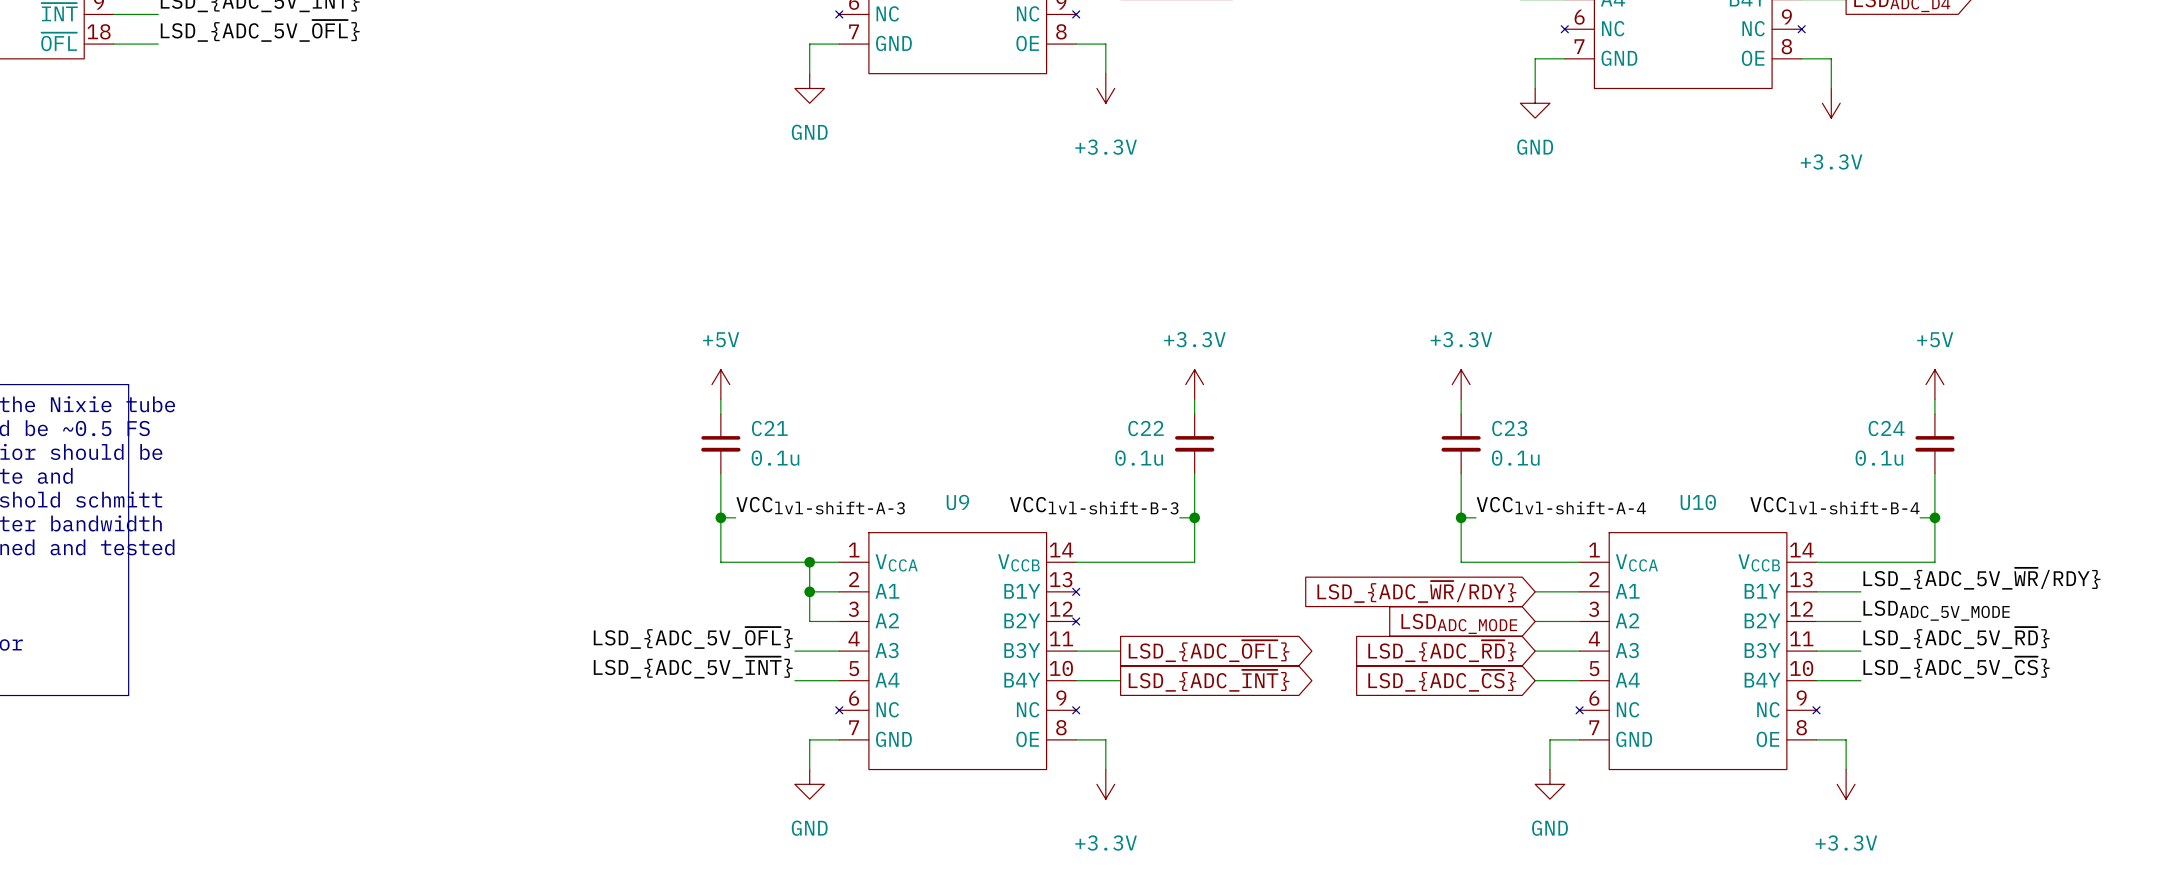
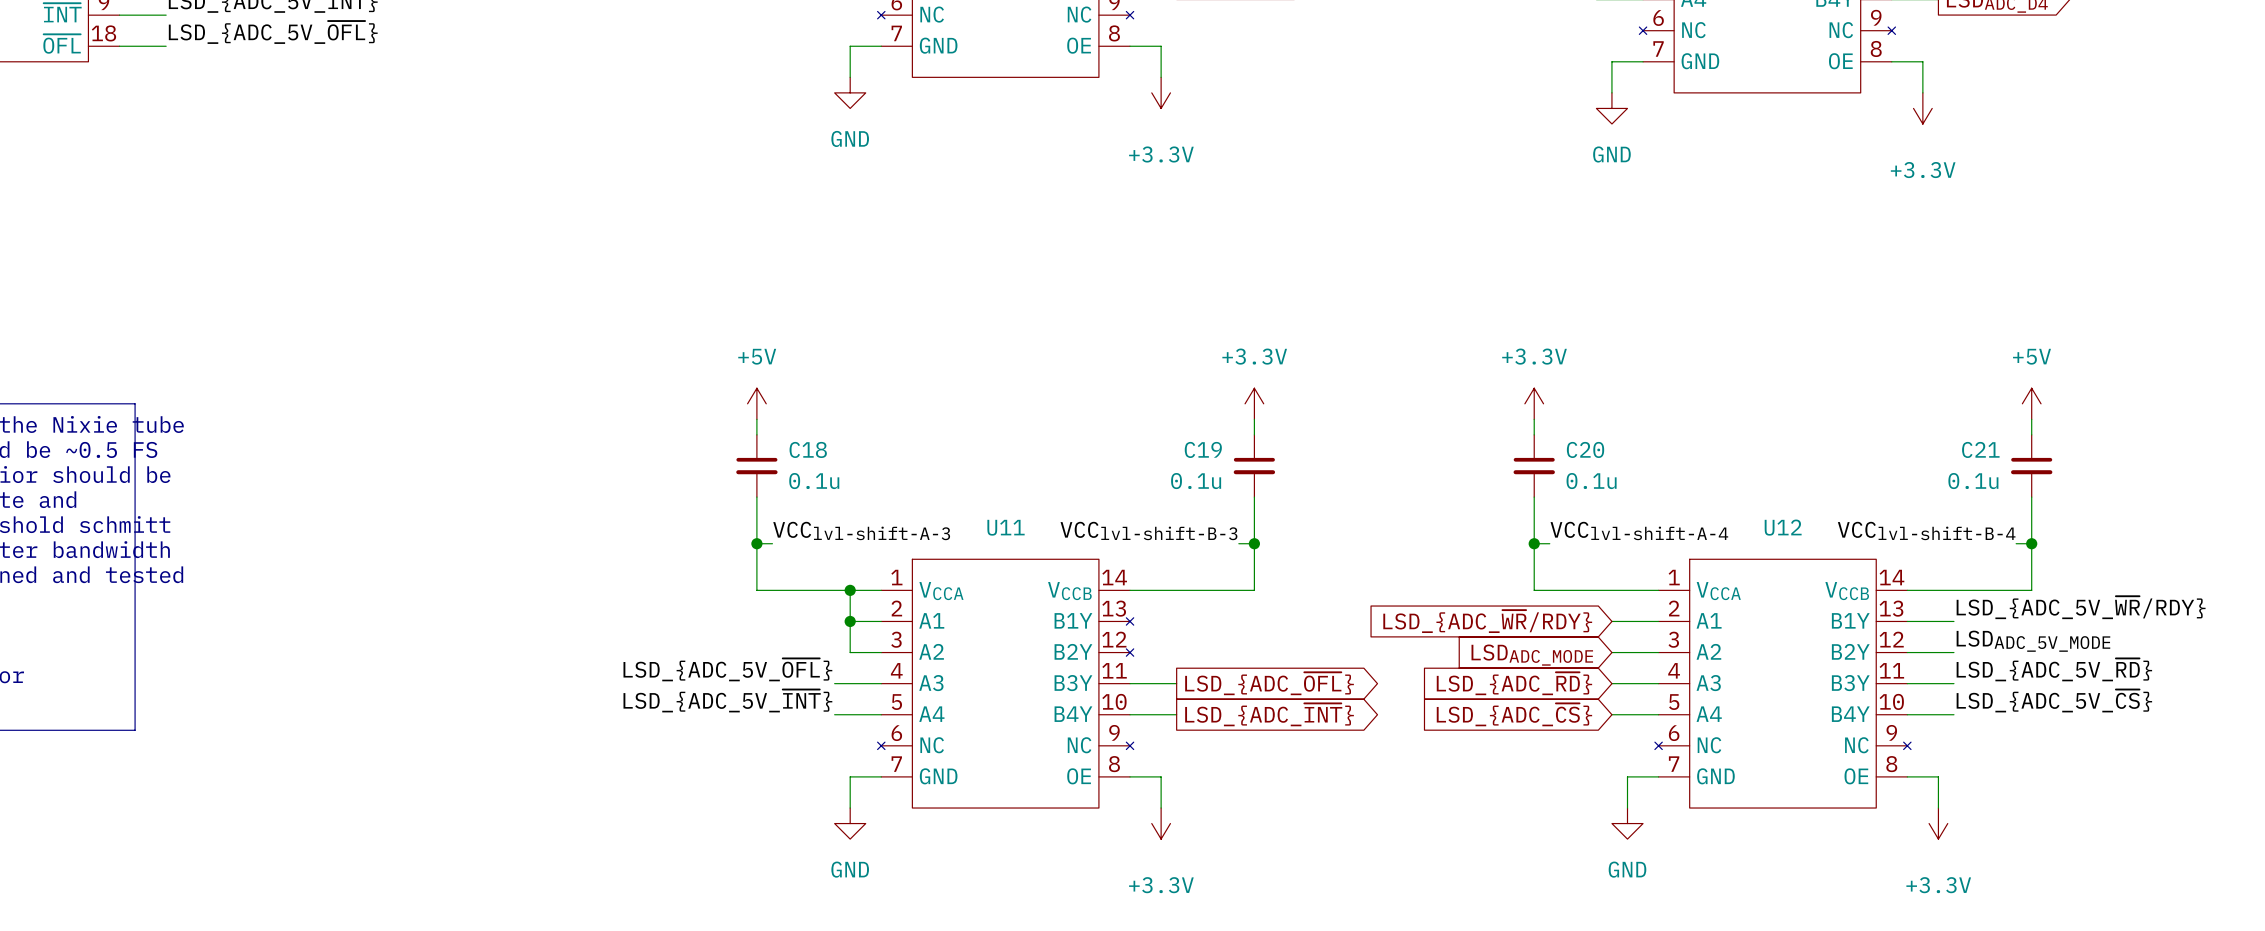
C21 name: C21 (769, 428) -> C18 (808, 449)
C22 name: C22 (1146, 428) -> C19 (1203, 449)
C23 name: C23 (1509, 428) -> C20 (1585, 449)
C24 name: C24 (1886, 428) -> C21 (1980, 449)
U9 name: U9 (957, 502) -> U11 (1006, 527)
U10 name: U10 (1698, 502) -> U12 (1783, 527)

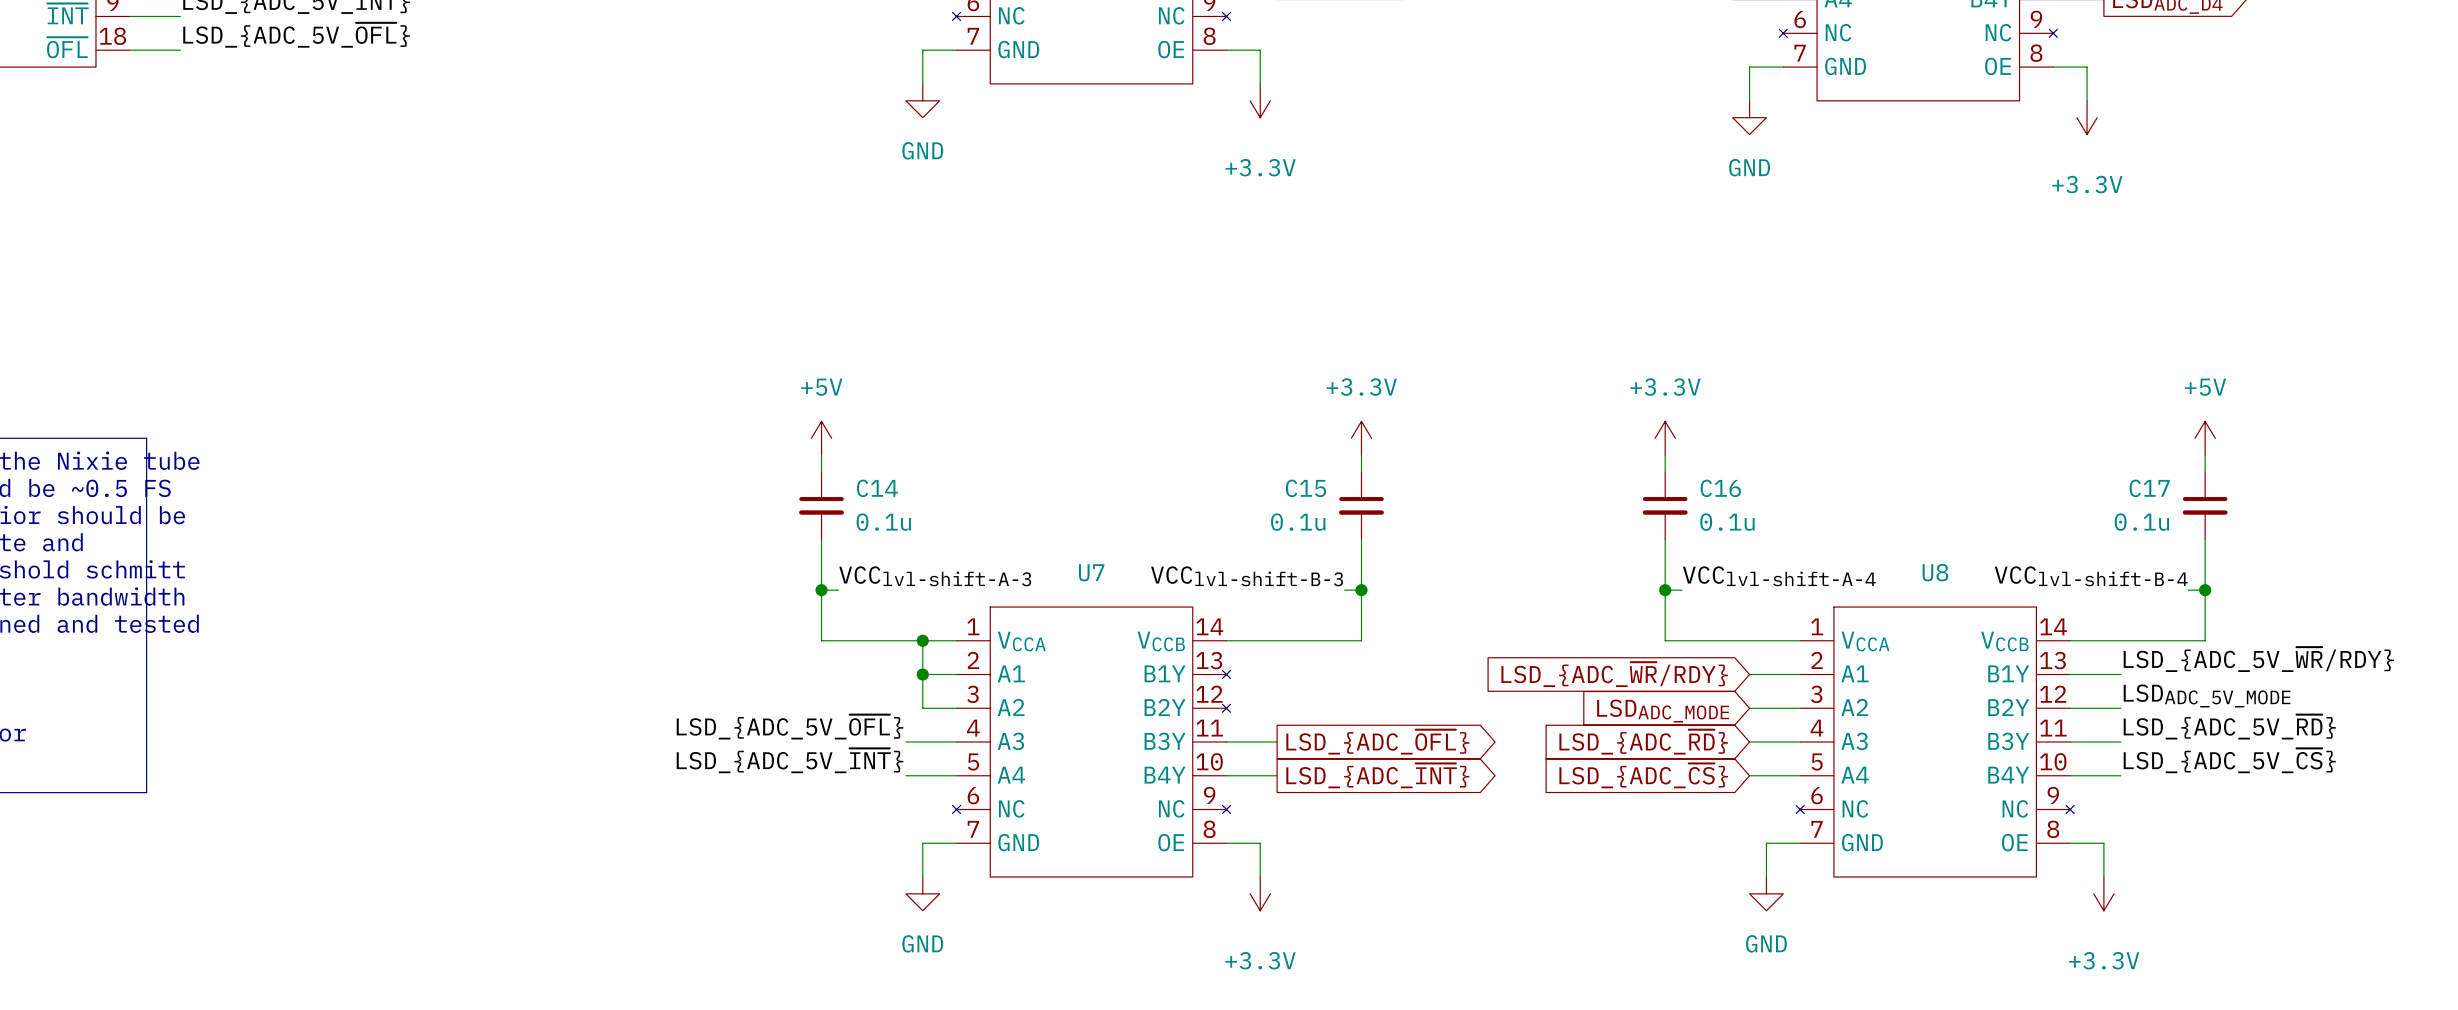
C18 name: C18 (808, 449) -> C14 (877, 488)
C19 name: C19 (1203, 449) -> C15 (1306, 488)
C20 name: C20 (1585, 449) -> C16 (1720, 488)
C21 name: C21 (1980, 449) -> C17 (2149, 488)
U11 name: U11 (1006, 527) -> U7 (1091, 572)
U12 name: U12 (1783, 527) -> U8 (1935, 572)

